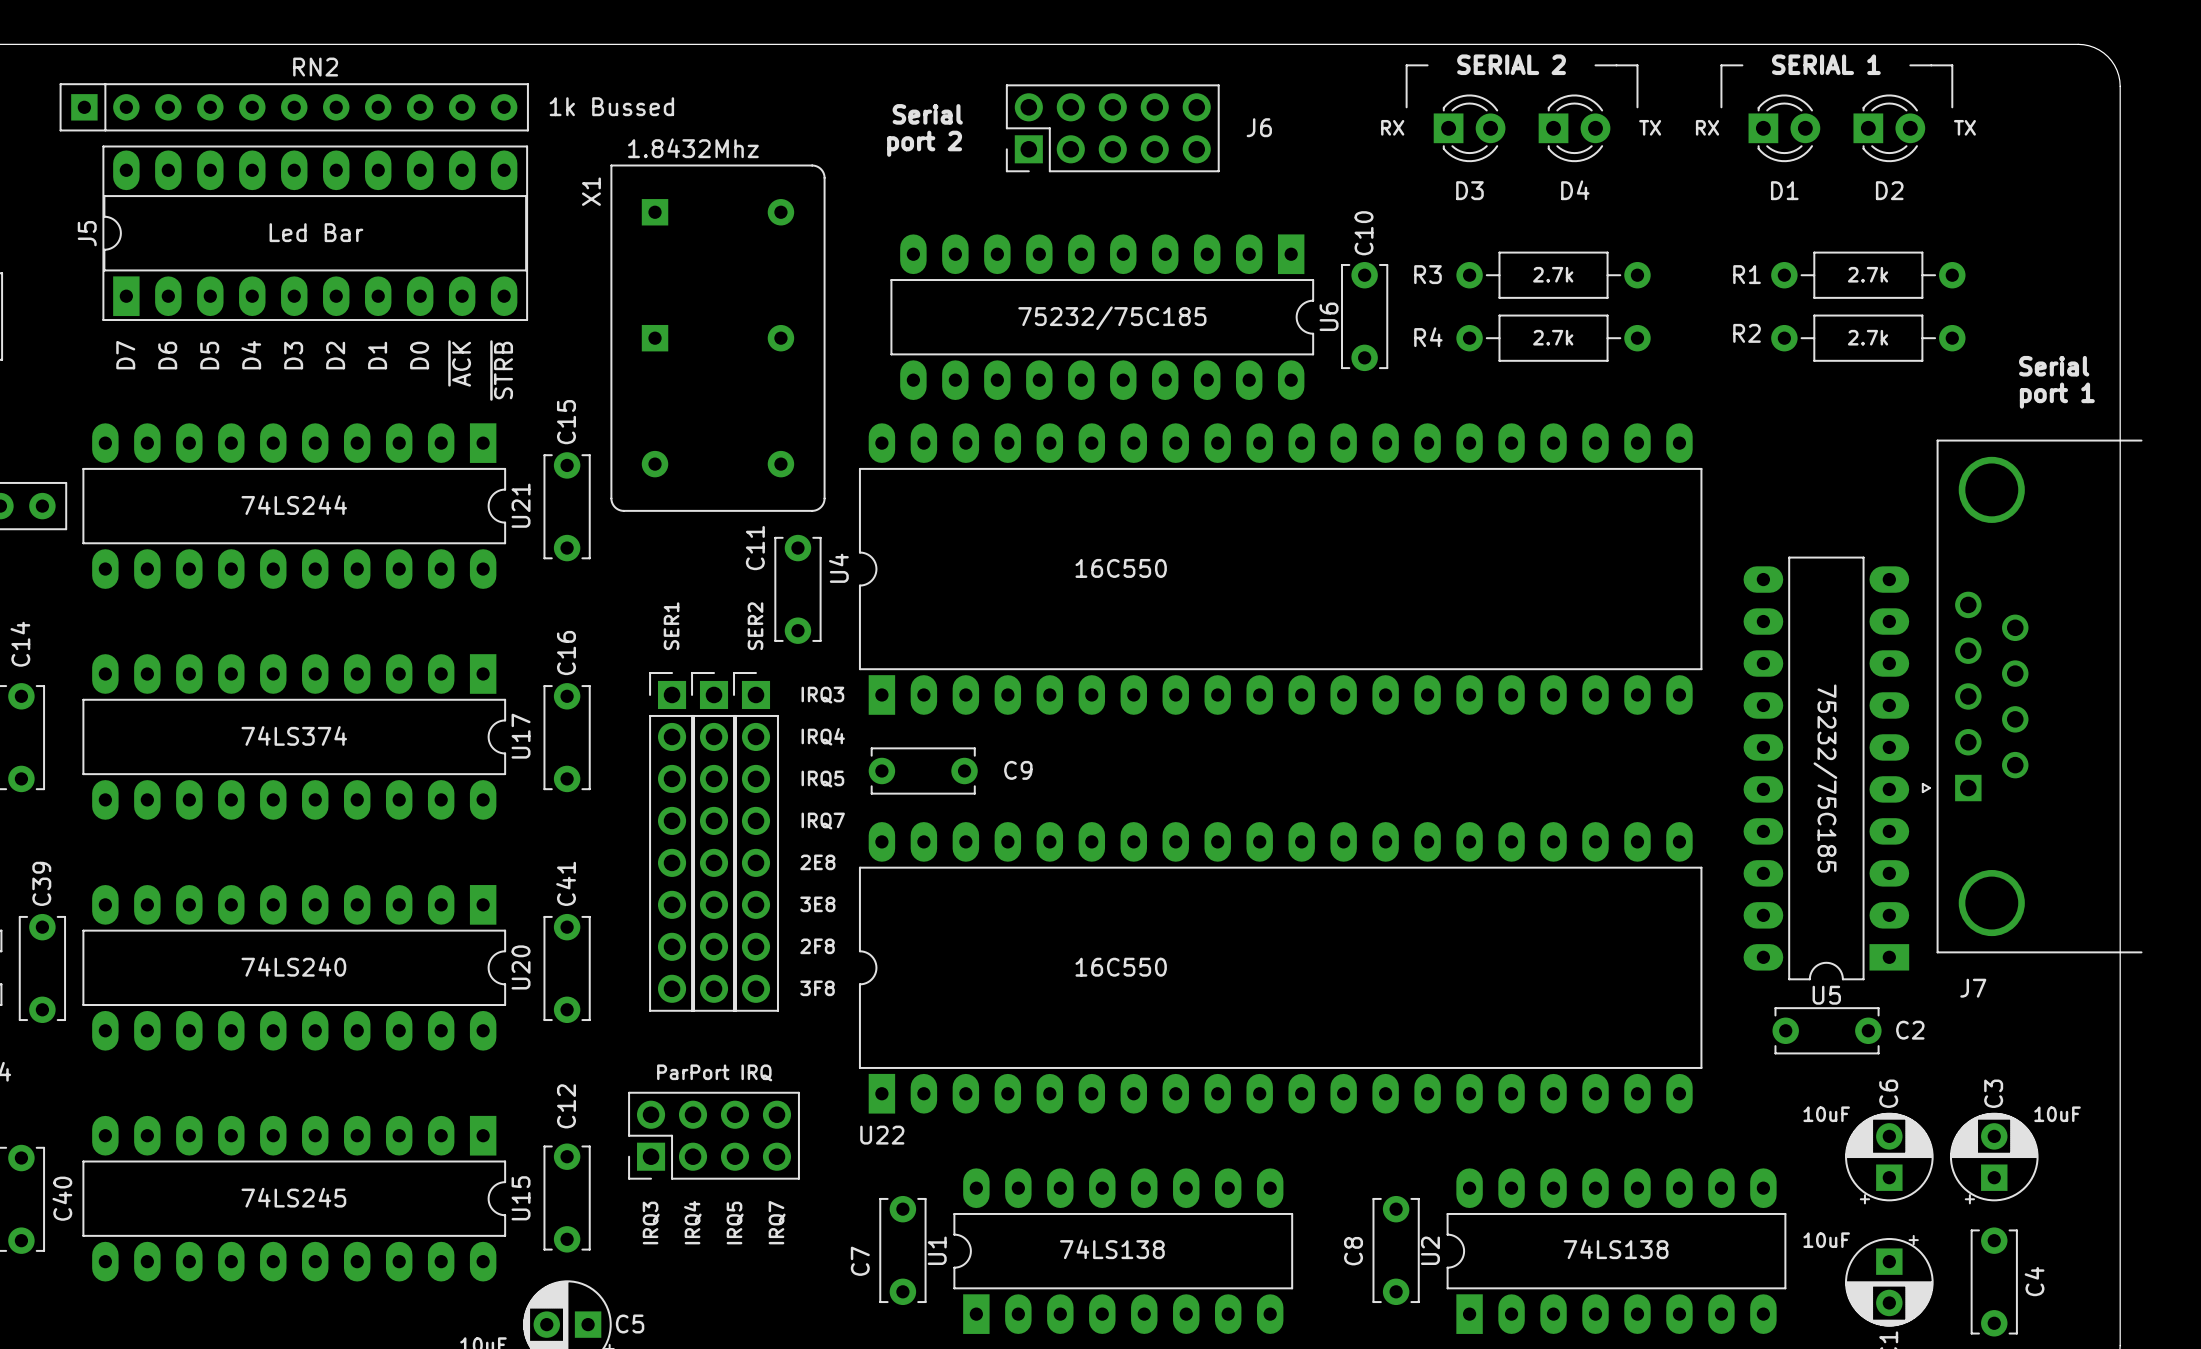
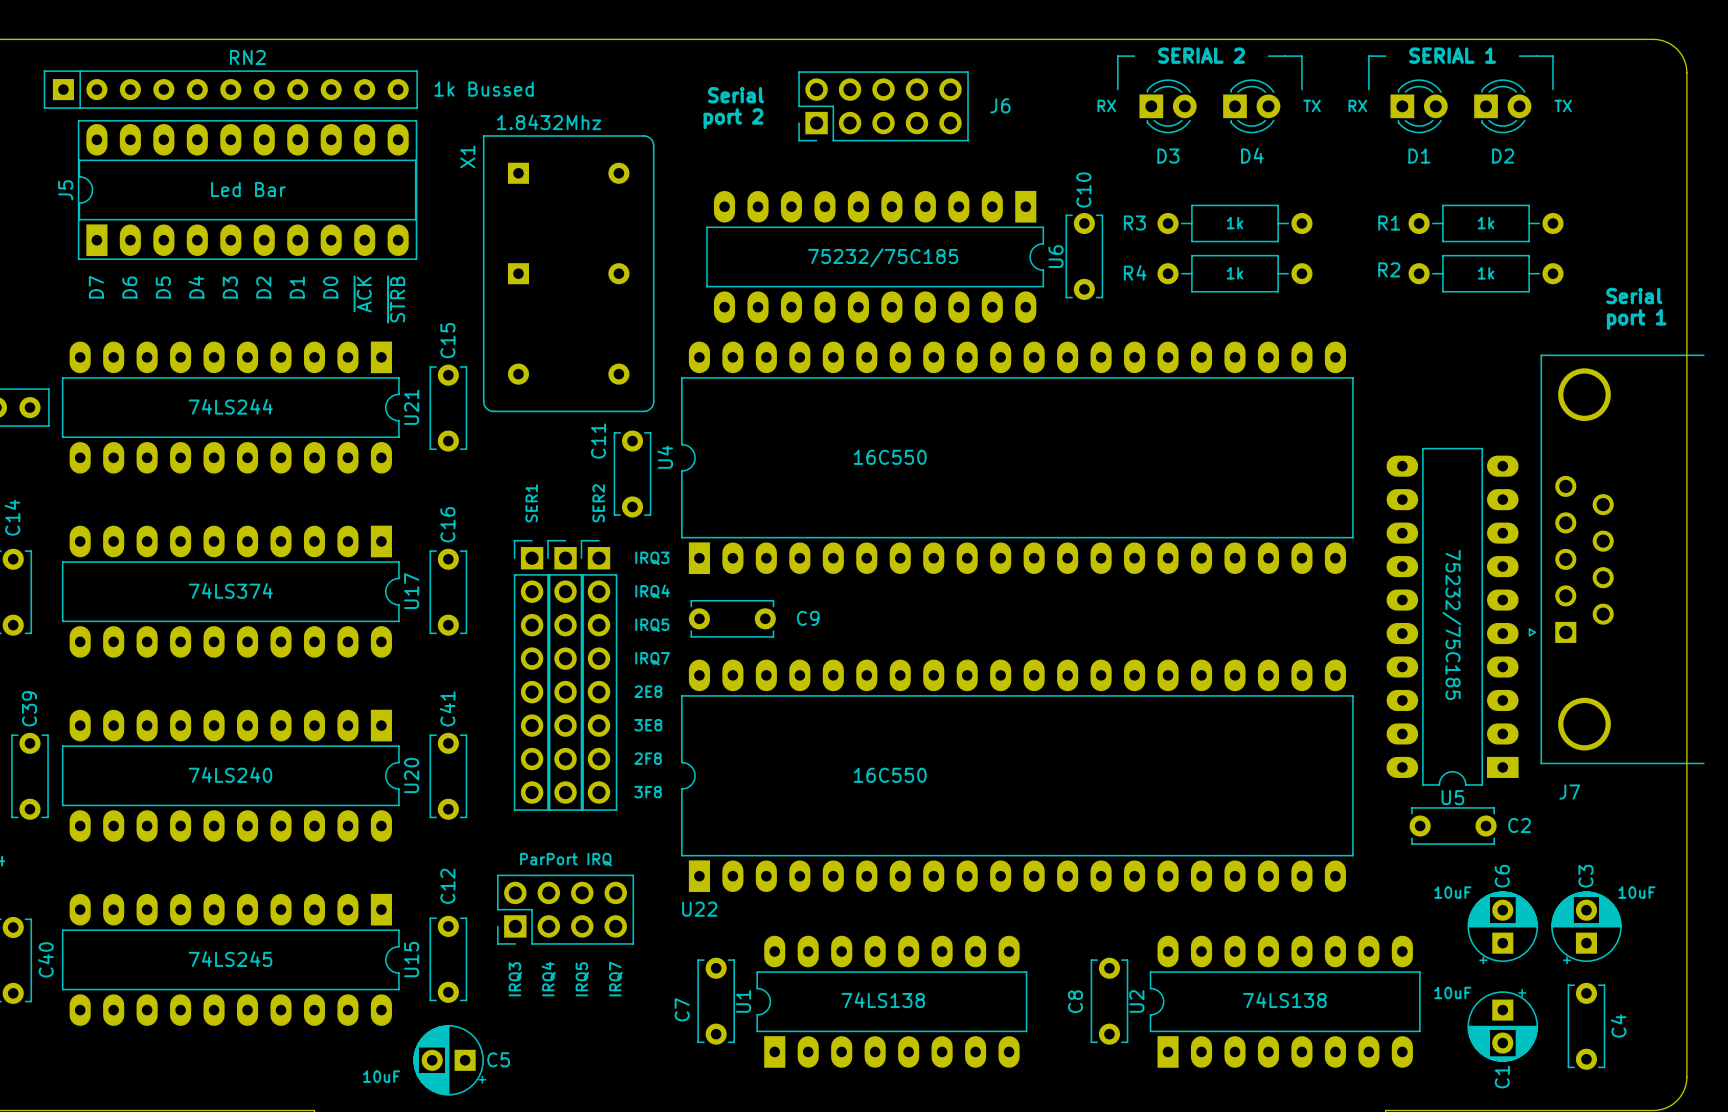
text: 2.7k (1553, 274) -> 1k (1234, 223)
text: 2.7k (1868, 274) -> 1k (1486, 223)
text: 2.7k (1553, 337) -> 1k (1234, 273)
text: 2.7k (1868, 337) -> 1k (1486, 273)

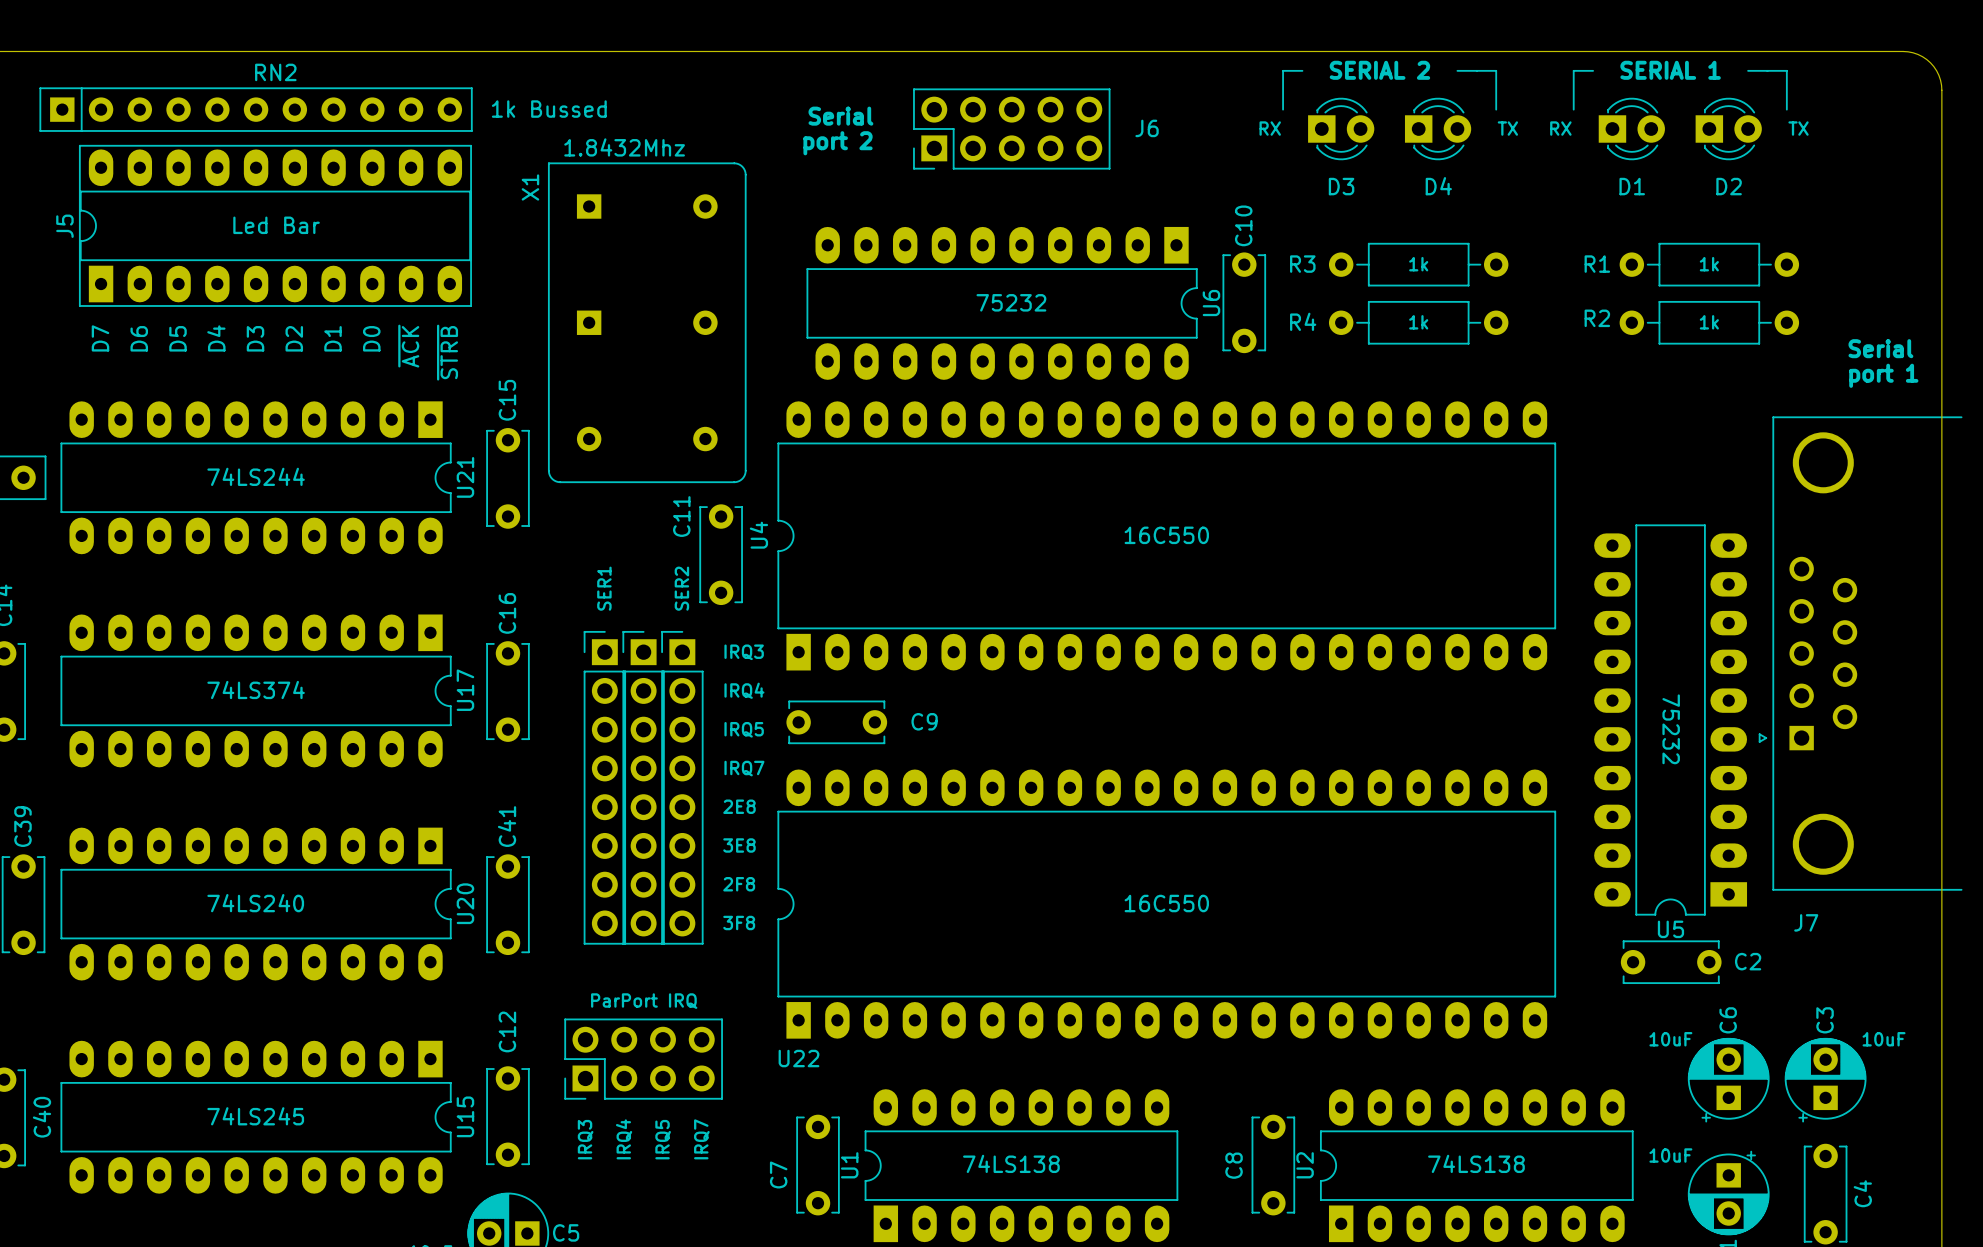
text: 75232/75C185 (883, 257) -> 75232 (1011, 302)
text position: 16C550 (890, 457) -> 16C550 (1166, 535)
text: 75232/75C185 (1451, 624) -> 75232 (1671, 729)
text position: 16C550 (890, 775) -> 16C550 (1166, 903)

